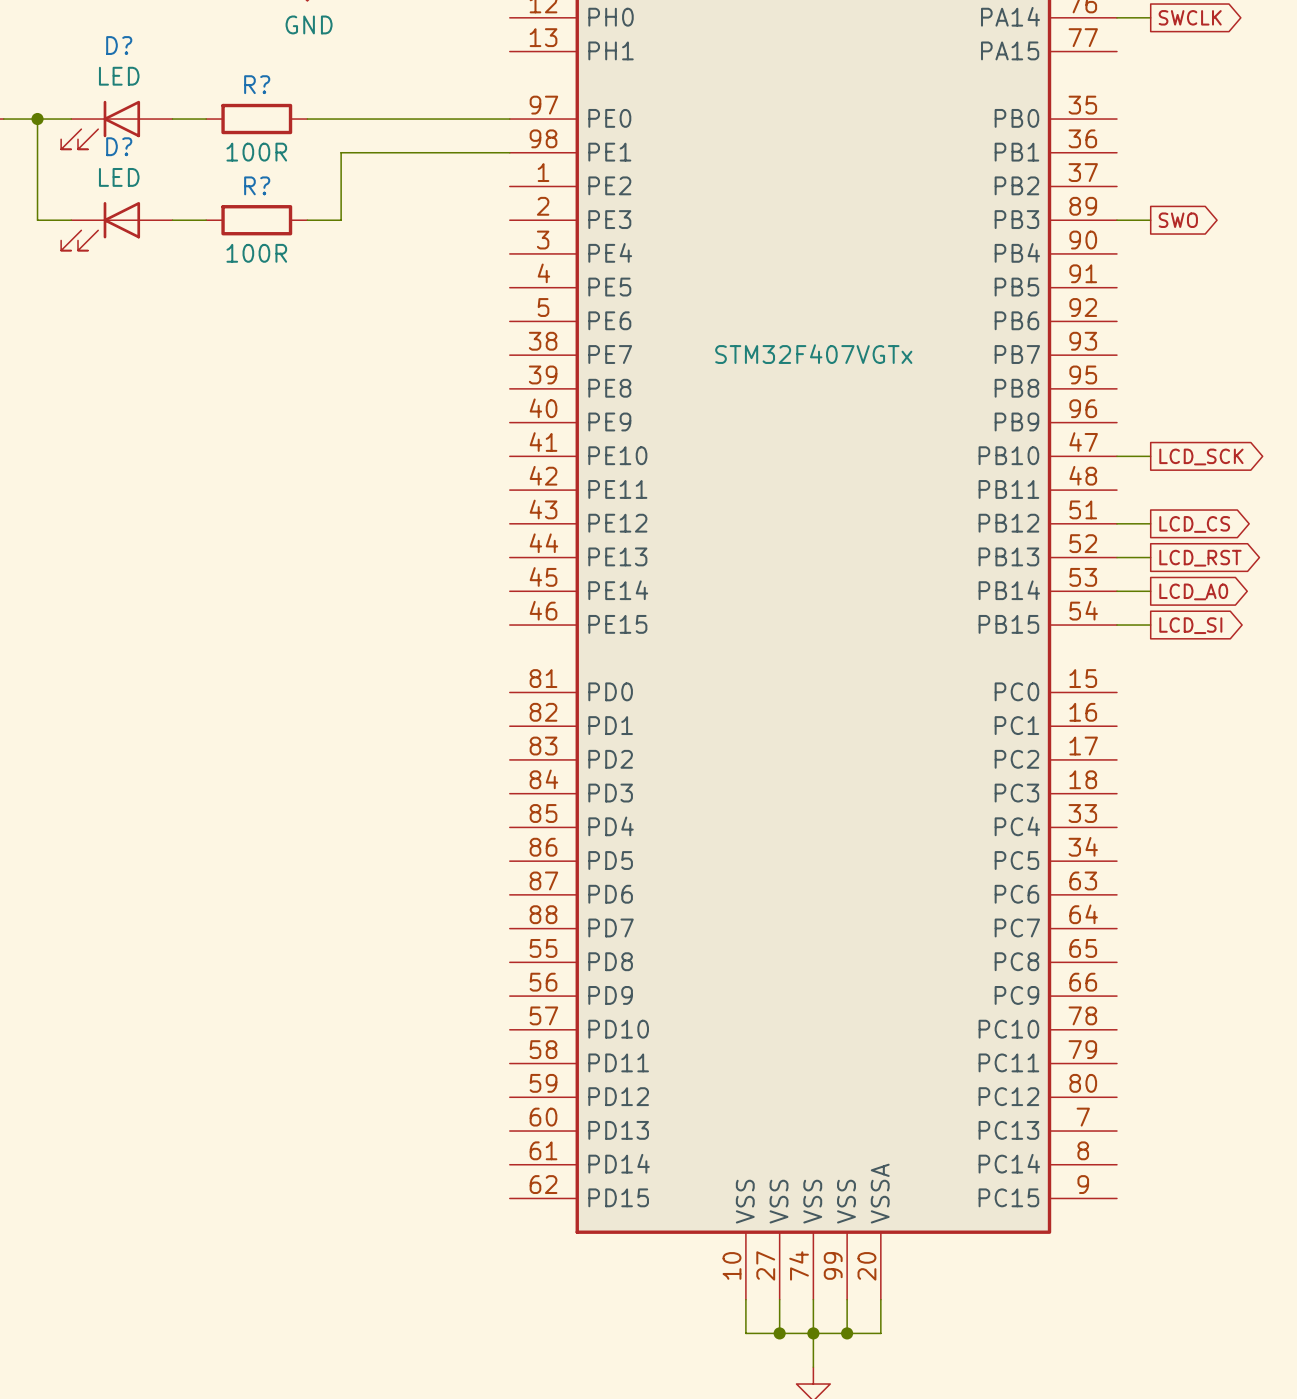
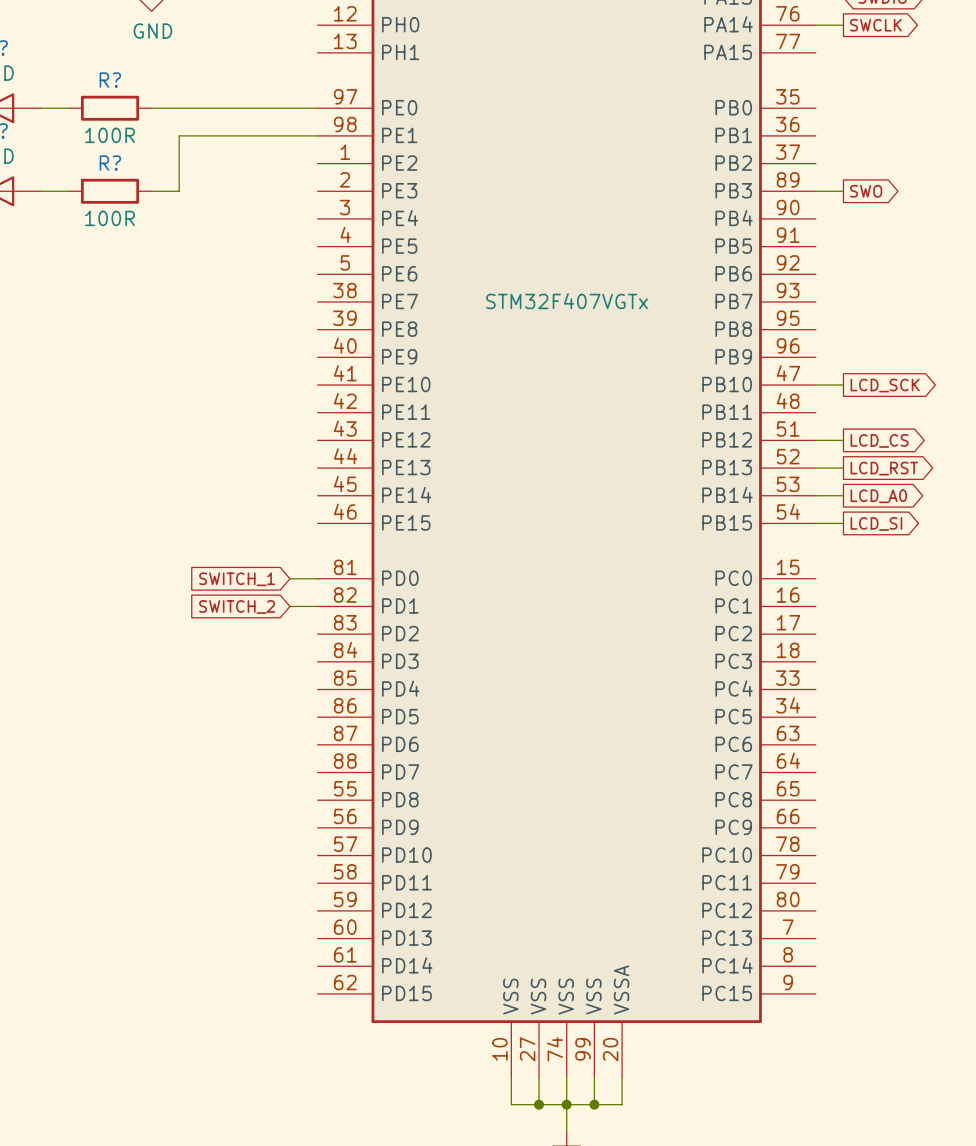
wire: none -> (289, 578) (317, 578)
global label: none -> SWITCH_1 (237, 579)
global label: none -> SWITCH_2 (237, 606)
wire: none -> (289, 606) (317, 606)

